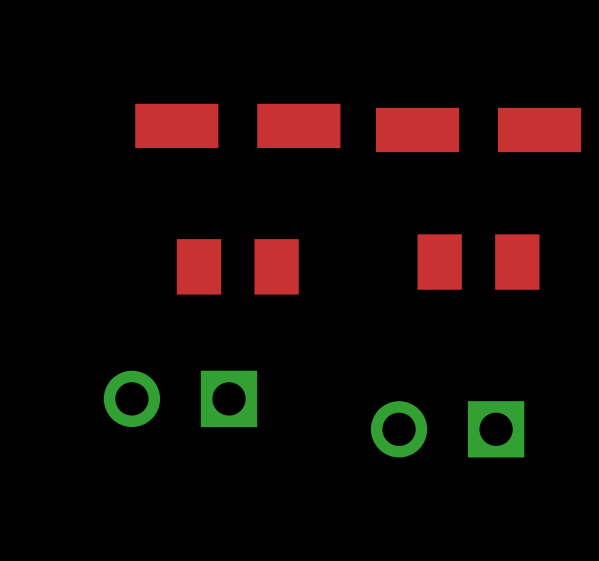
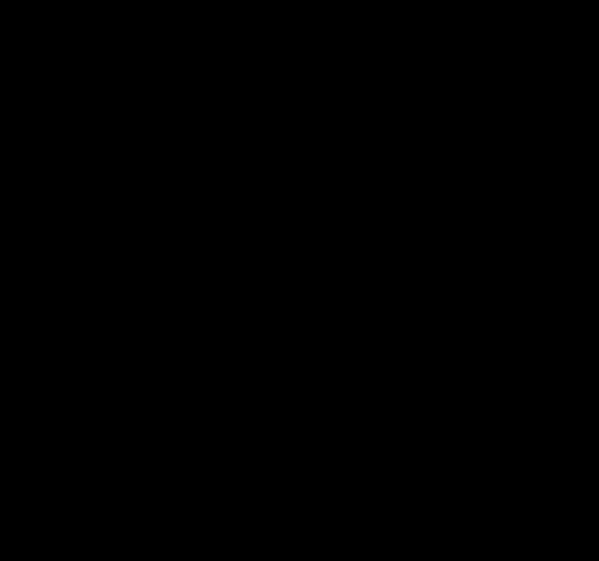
part: (237, 125) -> none
part: (478, 129) -> none
part: (478, 262) -> none
part: (237, 266) -> none
part: (180, 398) -> none
part: (447, 429) -> none

